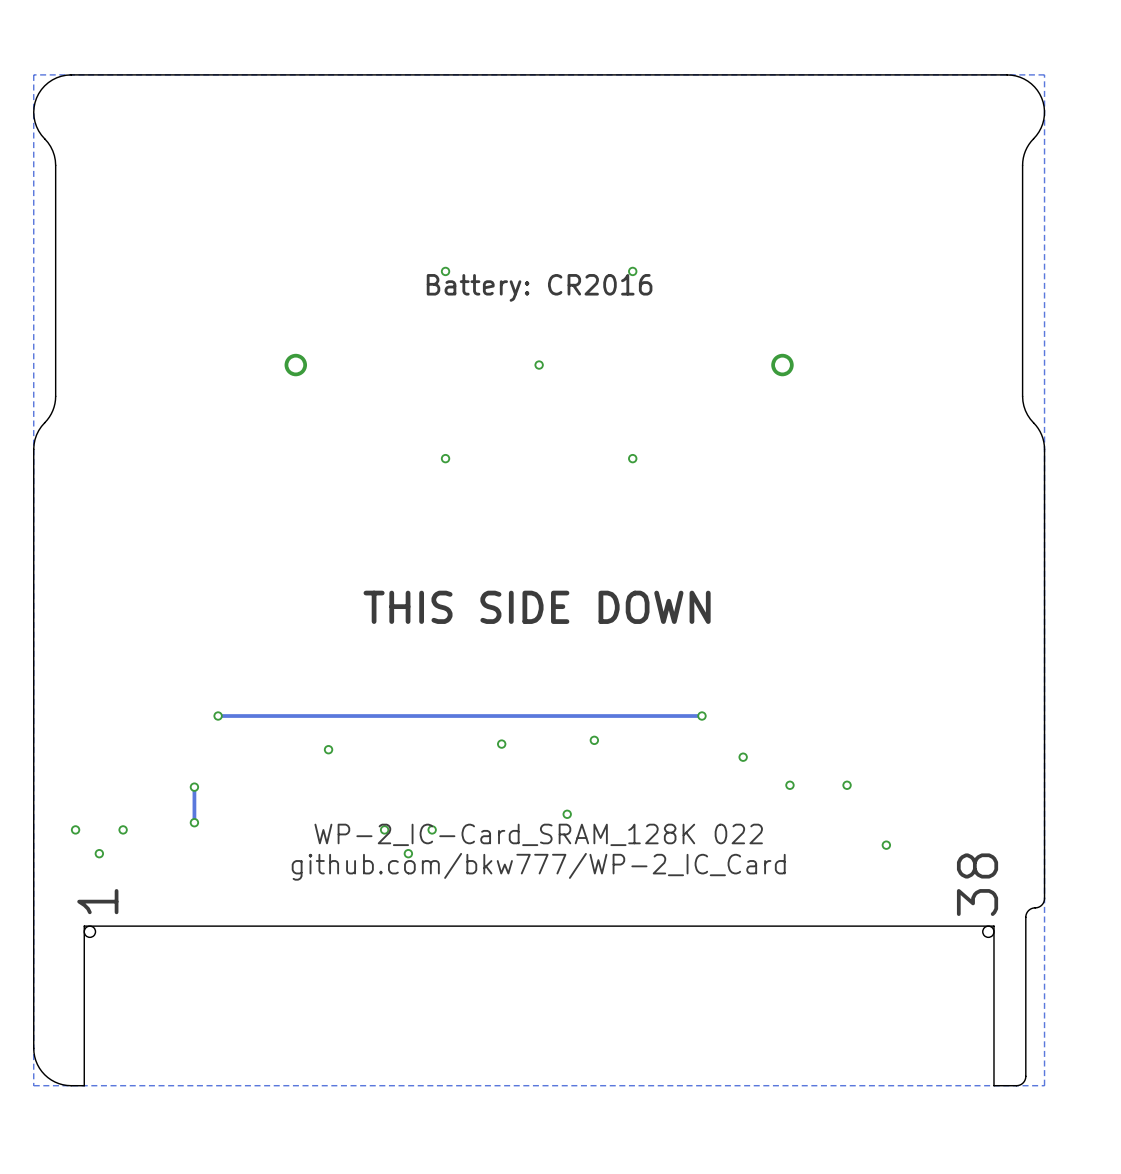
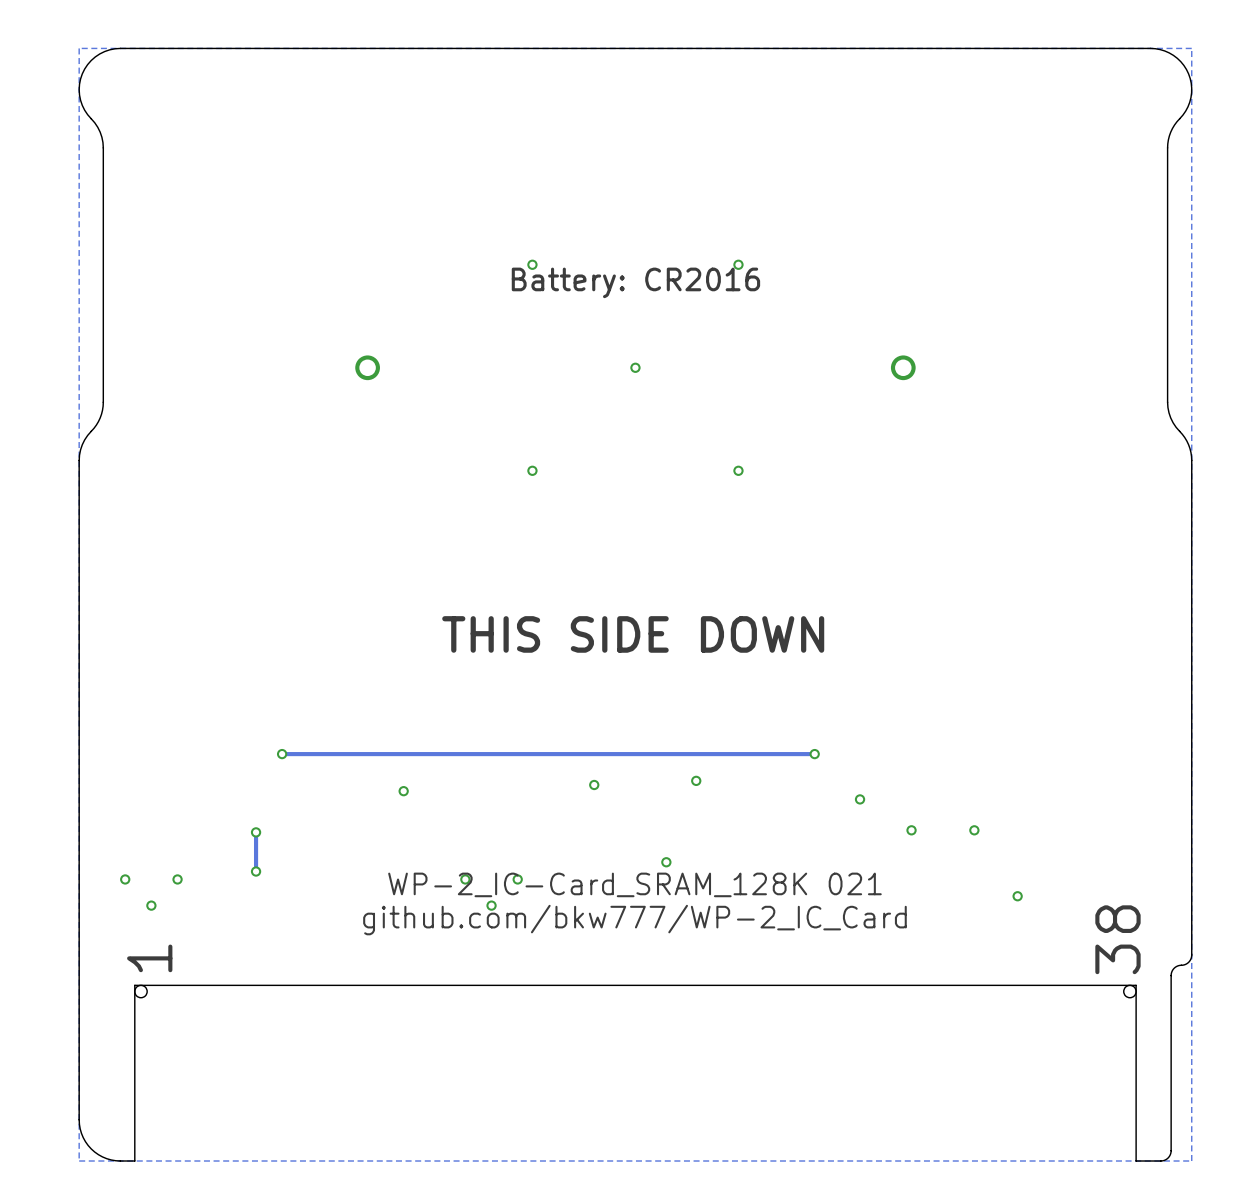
text: WP-2_IC-Card_SRAM_128K 022 (538, 834) -> WP-2_IC-Card_SRAM_128K 021 (634, 884)

